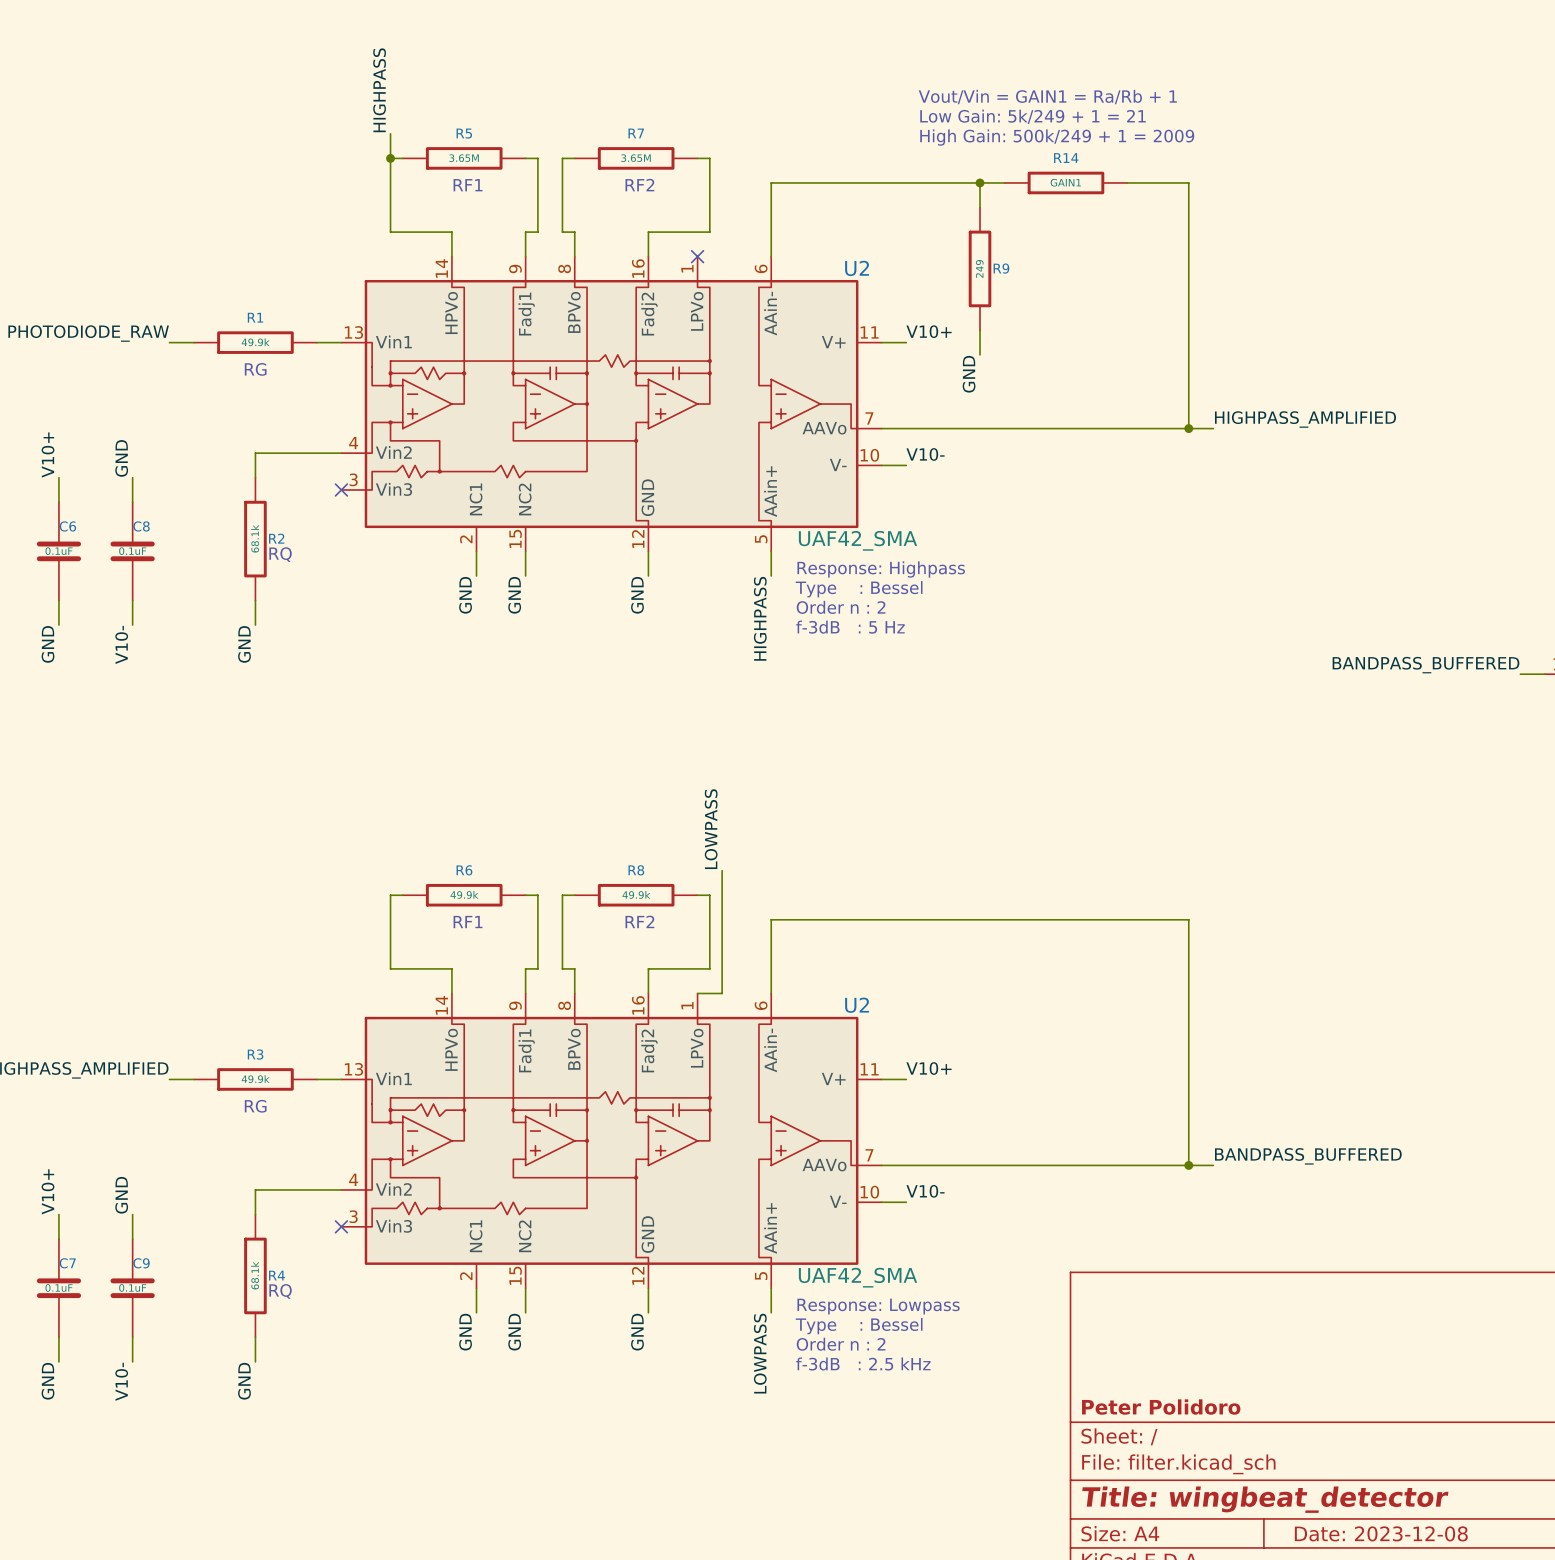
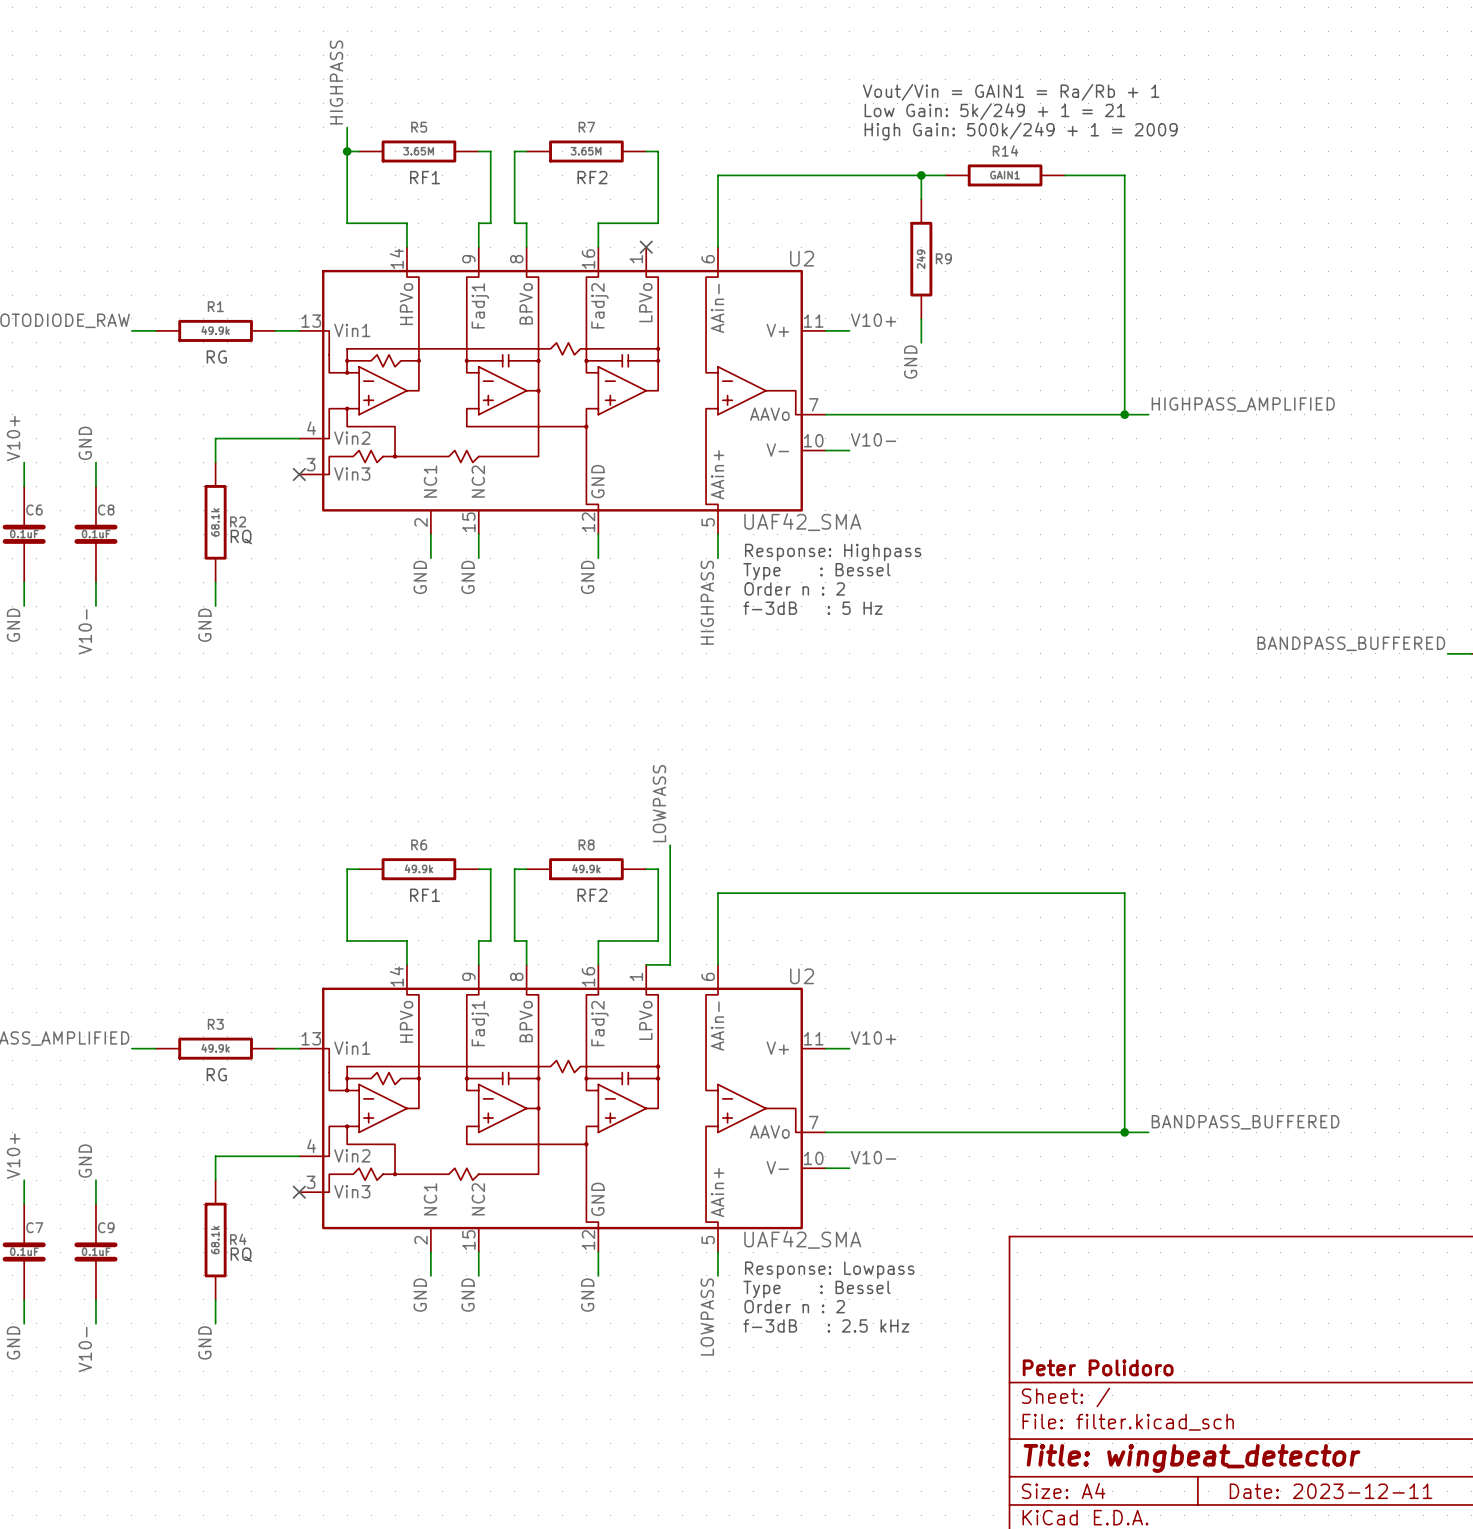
title block: Date: 2023-12-08 (1381, 1533) -> Date: 2023-12-11 (1331, 1491)

